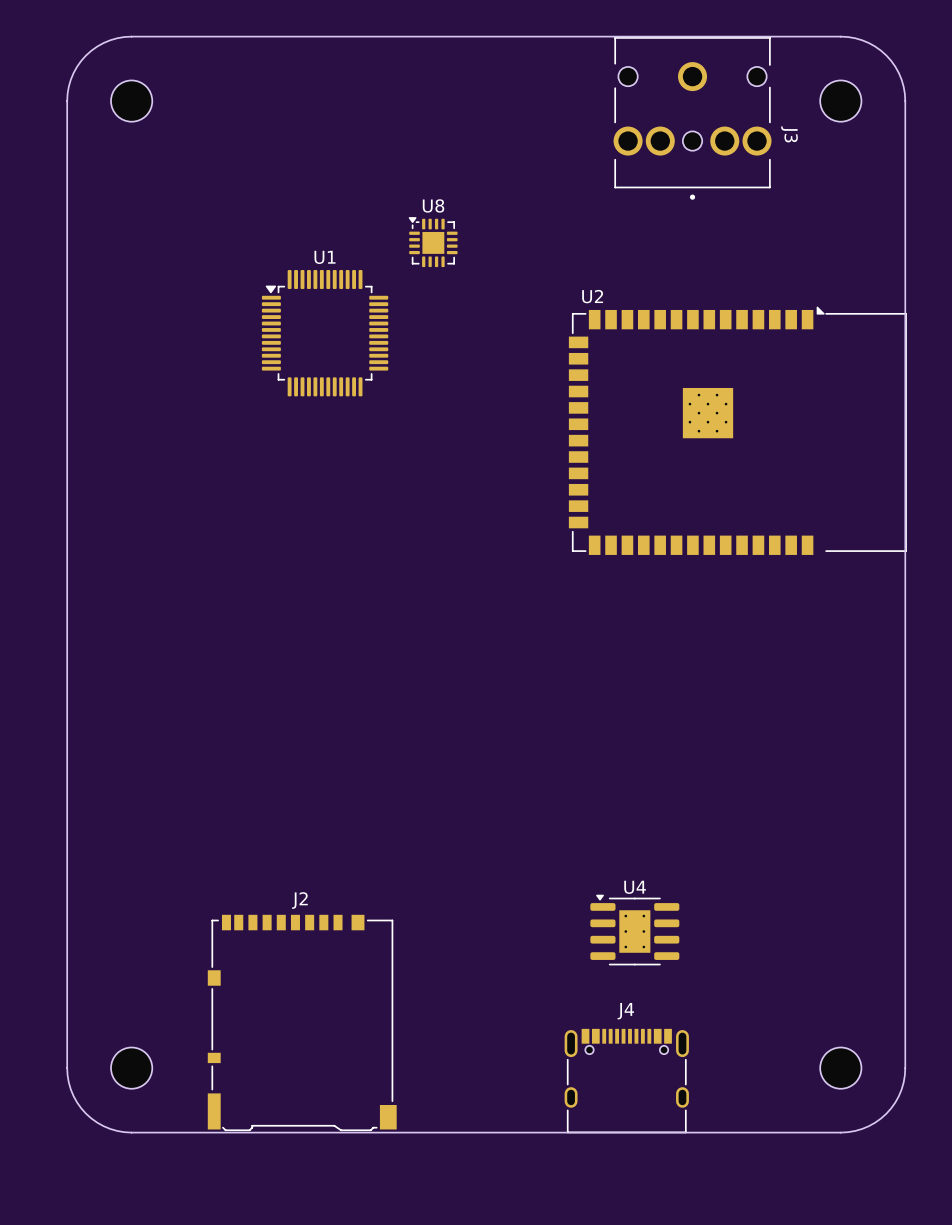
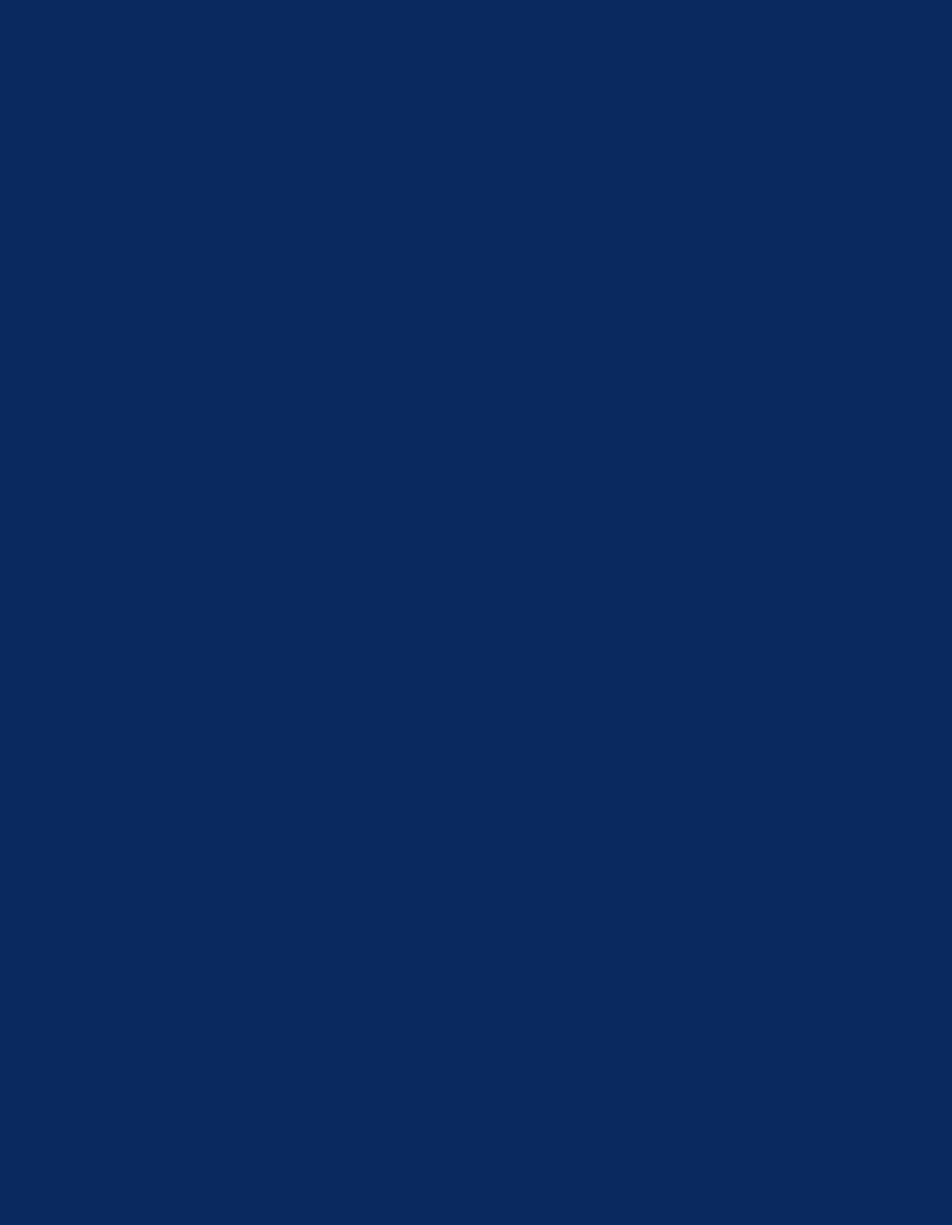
board edge: (840, 36) (131, 36) (117, 38) (97, 46) (86, 55) (77, 66) (70, 79) (67, 101) (67, 1068) (68, 1082) (77, 1102) (86, 1113) (97, 1122) (117, 1130) (131, 1132) (840, 1132) (855, 1130) (868, 1126) (881, 1118) (895, 1102) (903, 1082) (905, 1068) (905, 101) (903, 86) (898, 73) (886, 55) (868, 43) (855, 38) (840, 36) -> none
part: (131, 101) -> none
part: (840, 101) -> none
J3: (692, 118) -> none
U8: (433, 242) -> none
U1: (325, 333) -> none
U2: (737, 430) -> none
U4: (634, 930) -> none
J2: (302, 1022) -> none
part: (131, 1068) -> none
part: (840, 1068) -> none
J4: (626, 1081) -> none

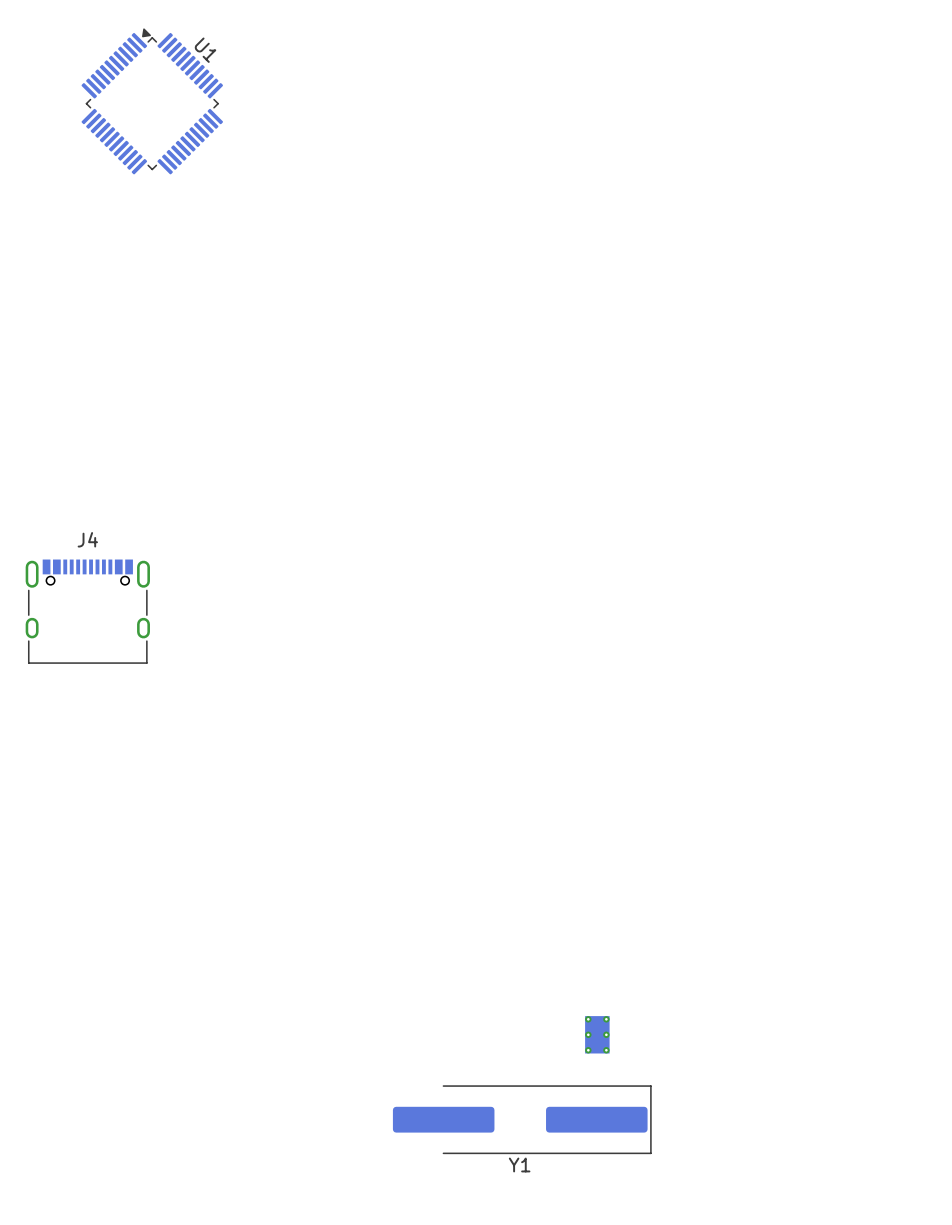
U1: none -> (152, 101)
J4: none -> (87, 611)
part: none -> (597, 1034)
Y1: none -> (522, 1119)

